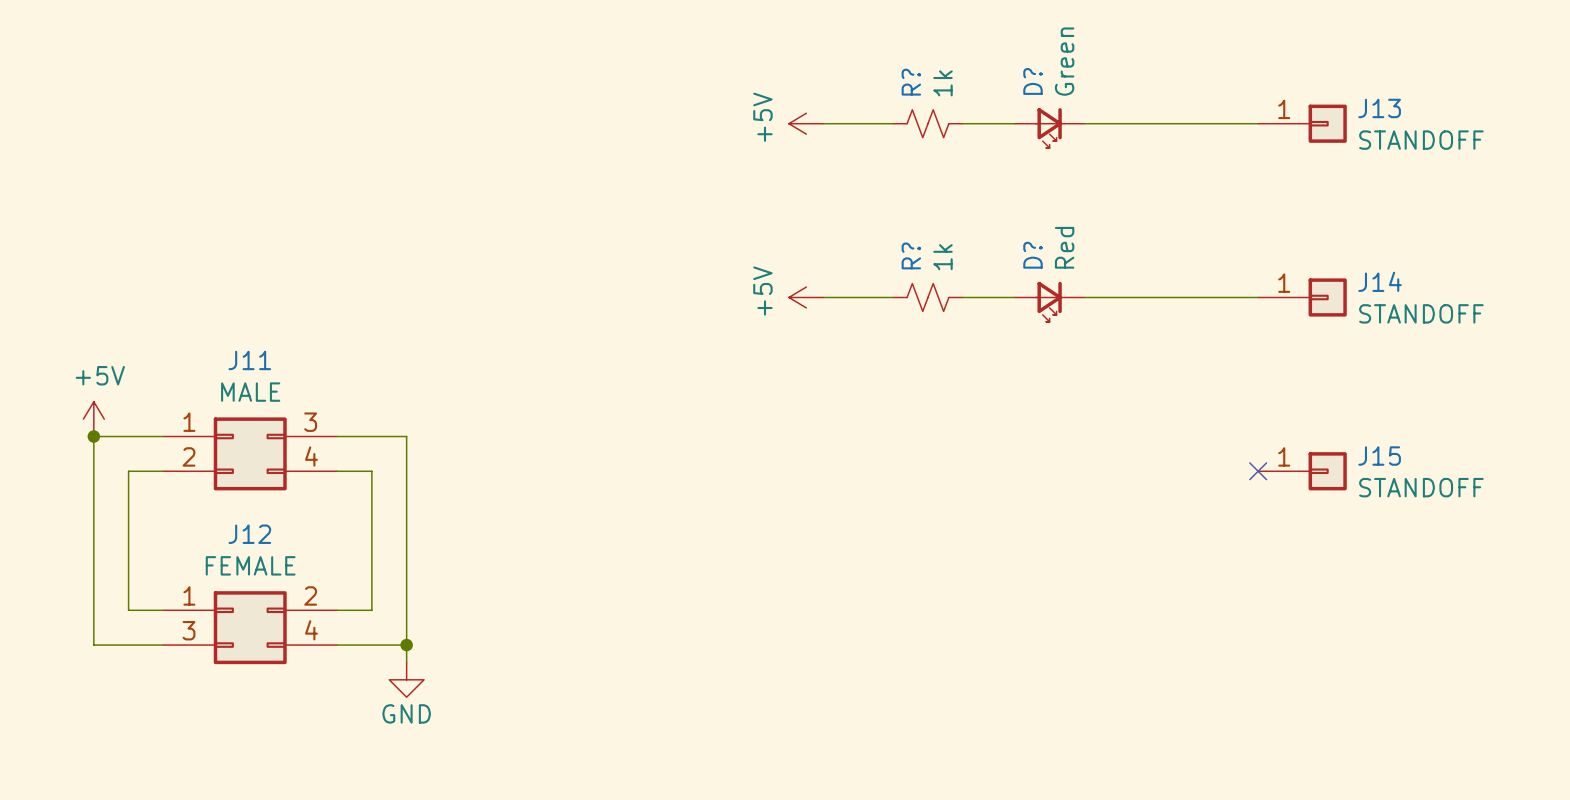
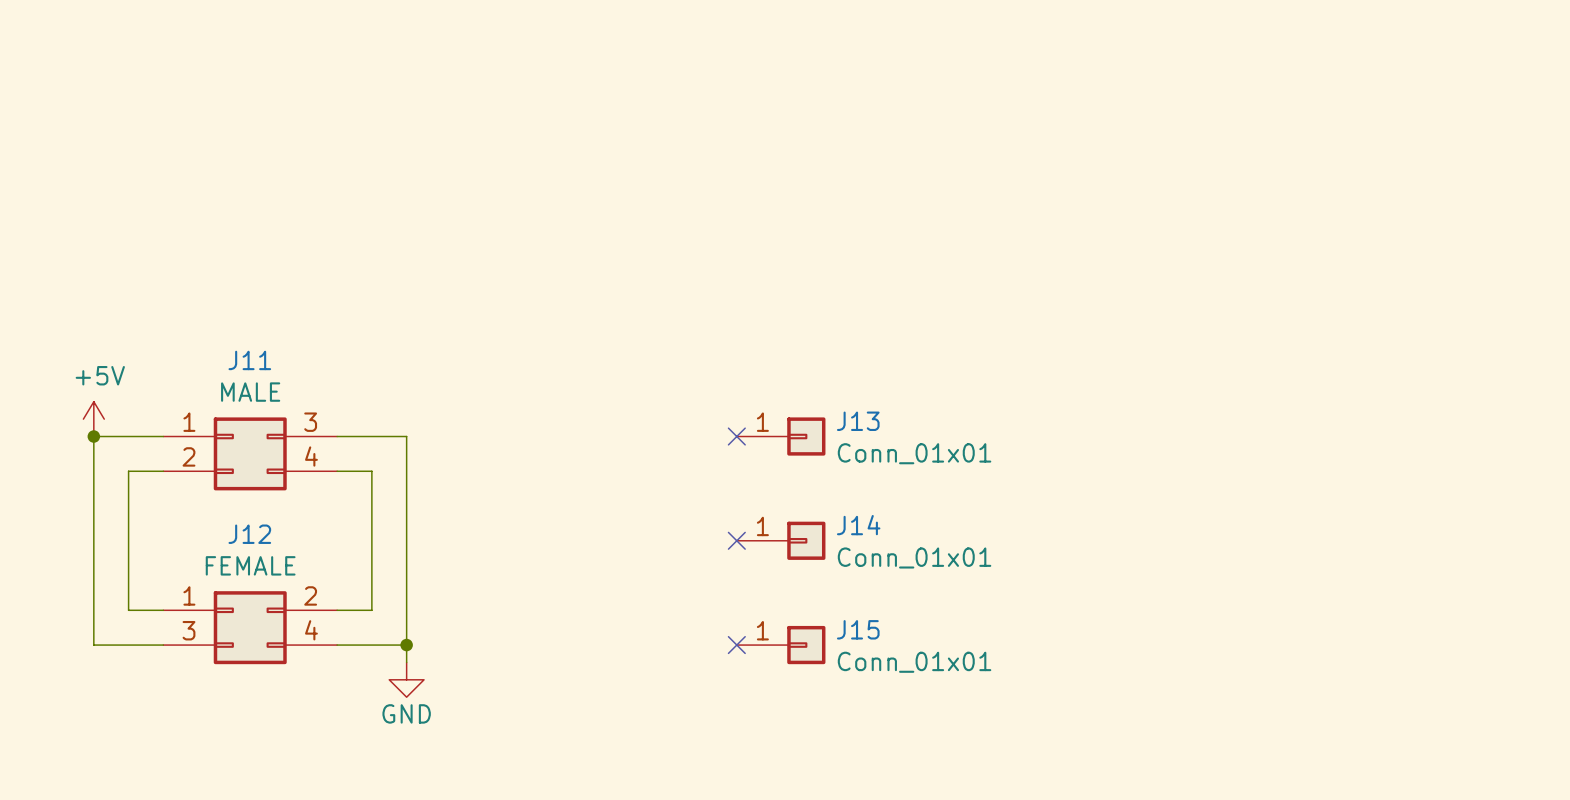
power symbol: +5V (806, 123) -> none
wire: (823, 123) (893, 123) -> none
R?: 1k (927, 123) -> none
wire: (962, 123) (1014, 123) -> none
wire: (1084, 123) (1258, 123) -> none
J13 position: (1302, 123) -> (781, 436)
D?: Green (1049, 128) -> none
J13 value: STANDOFF (1421, 140) -> Conn_01x01 (914, 453)
power symbol: +5V (806, 297) -> none
wire: (823, 297) (893, 297) -> none
R?: 1k (927, 297) -> none
wire: (962, 297) (1014, 297) -> none
wire: (1084, 297) (1258, 297) -> none
J14 position: (1302, 297) -> (781, 540)
D?: Red (1049, 301) -> none
J14 value: STANDOFF (1421, 313) -> Conn_01x01 (914, 557)
no-connect mark: none -> (736, 436)
no-connect mark: (1258, 471) -> none
J15 position: (1302, 471) -> (781, 645)
J15 value: STANDOFF (1421, 487) -> Conn_01x01 (914, 662)
no-connect mark: none -> (736, 540)
no-connect mark: none -> (736, 645)

